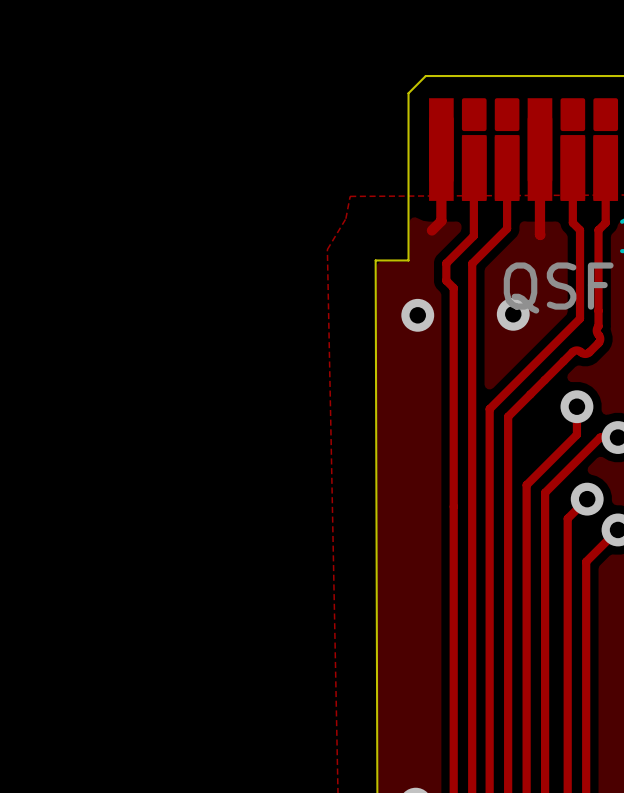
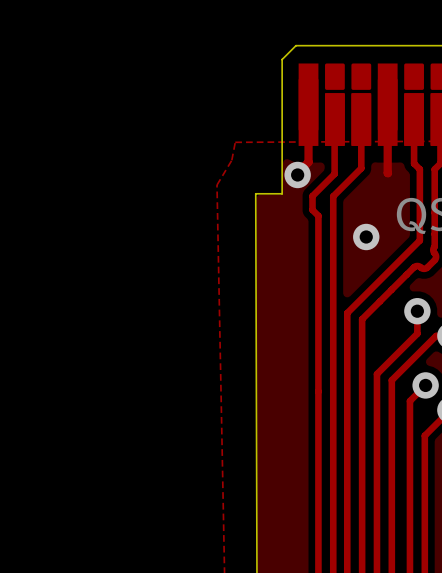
via position: (417, 315) -> (297, 174)

